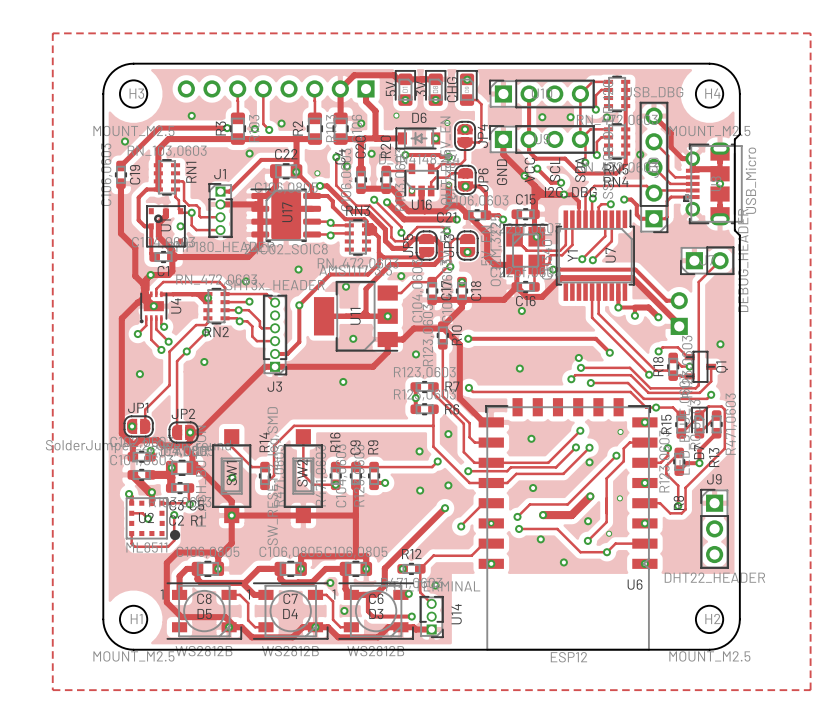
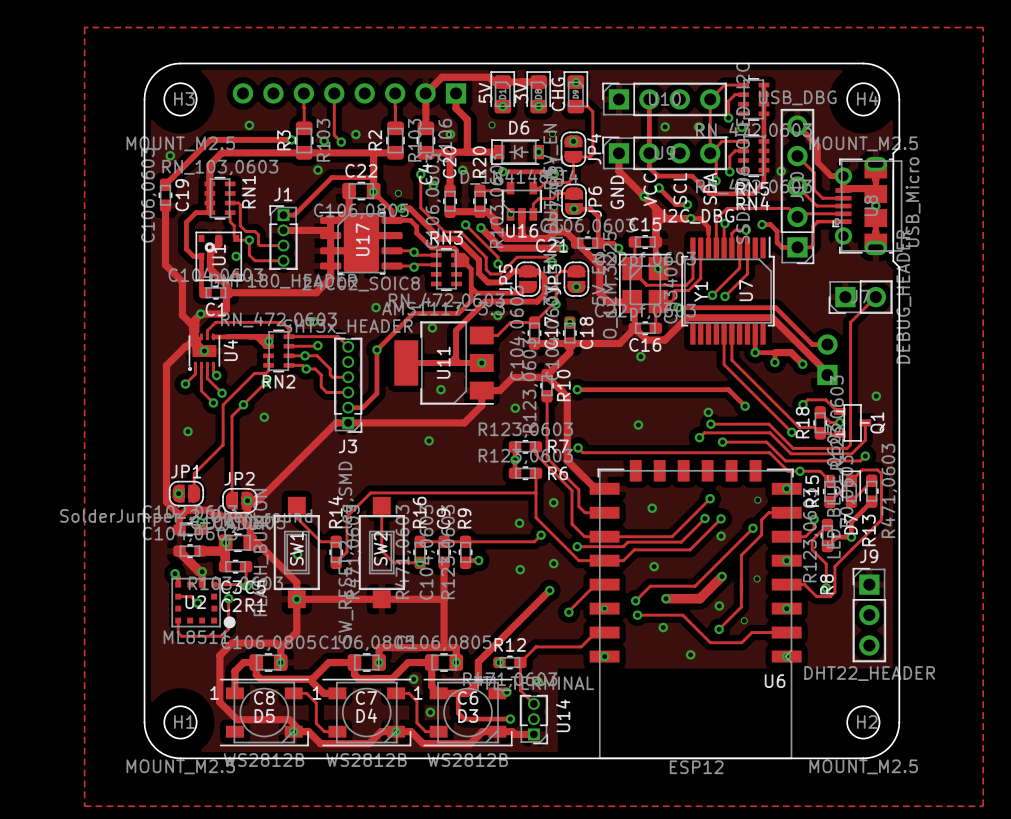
via: (606, 552) -> none

